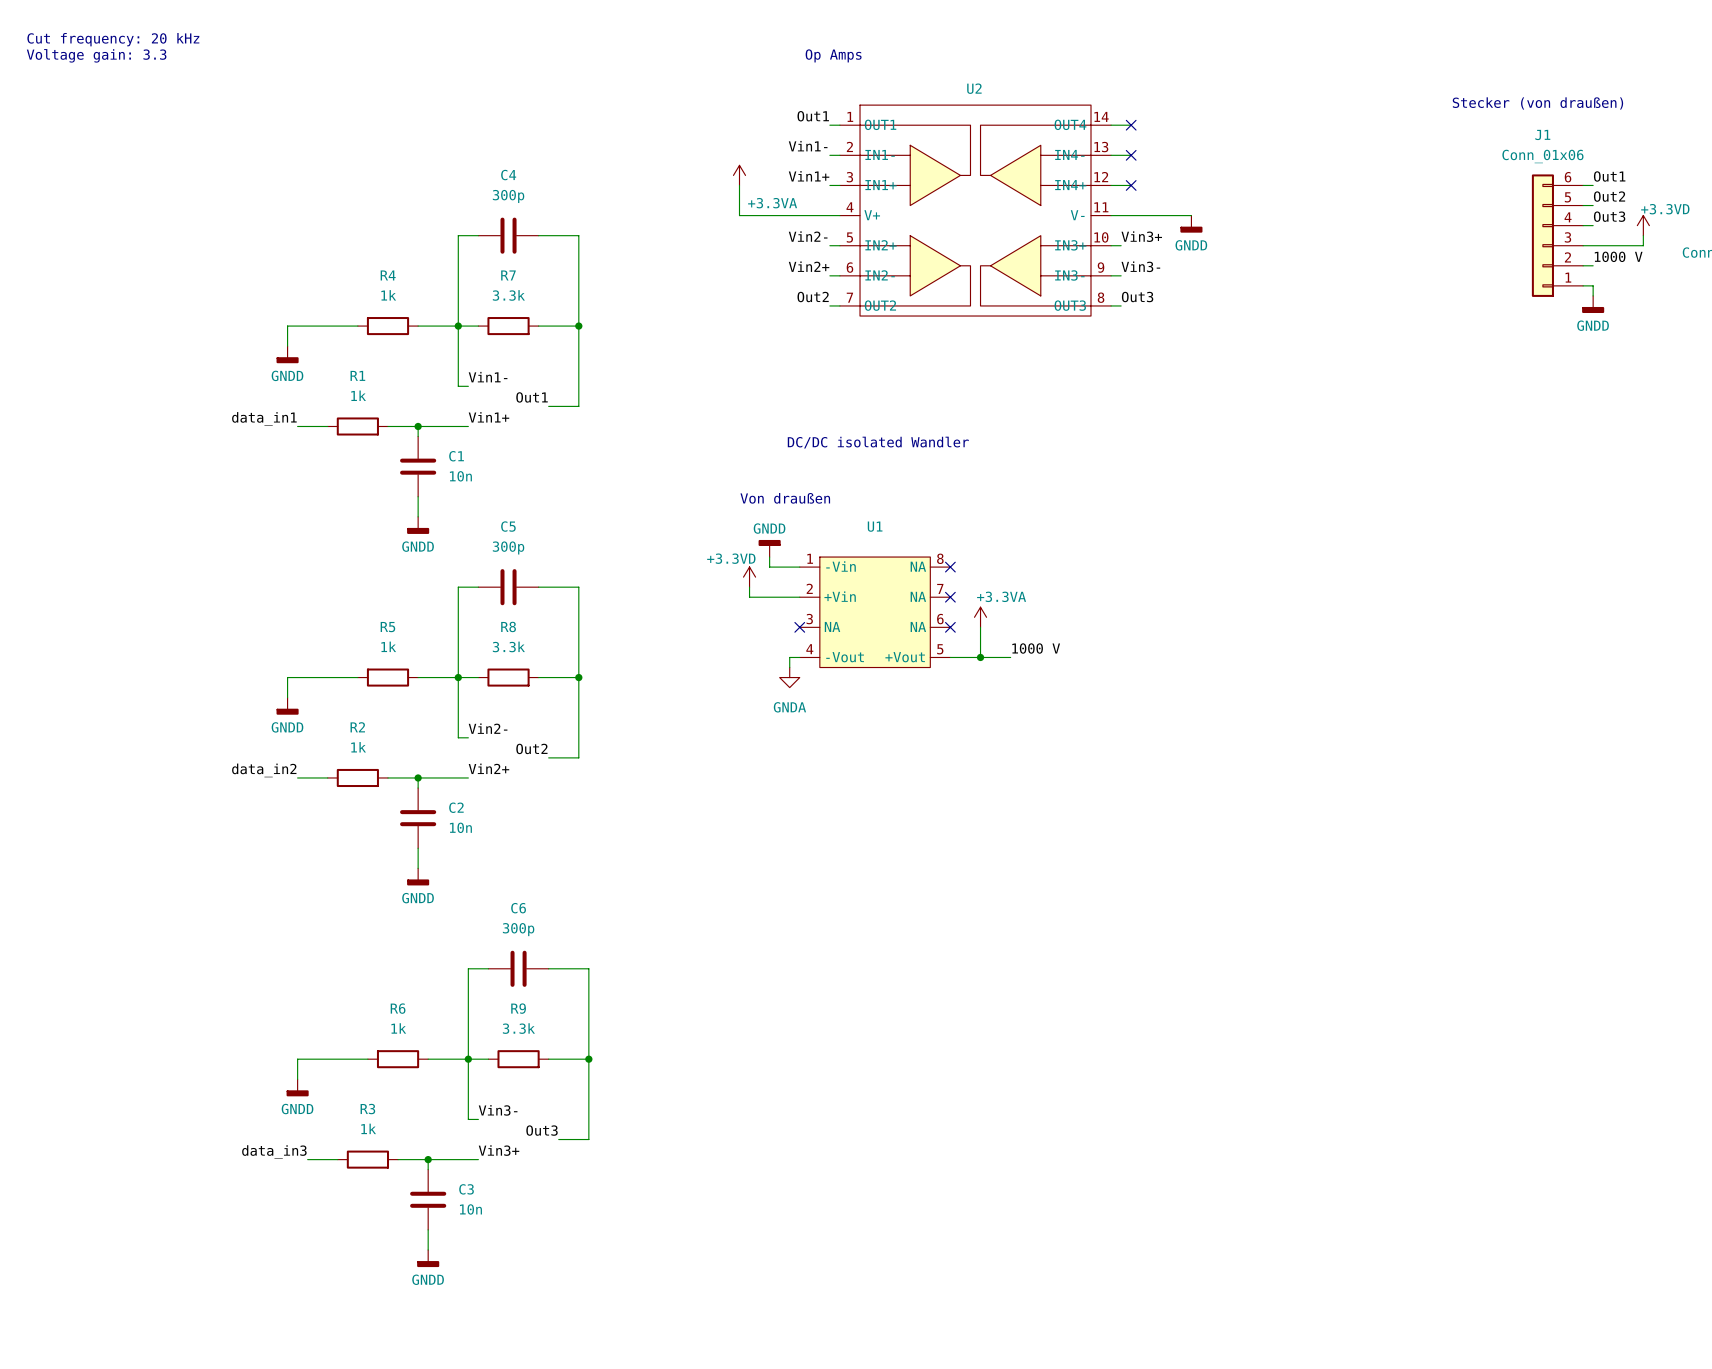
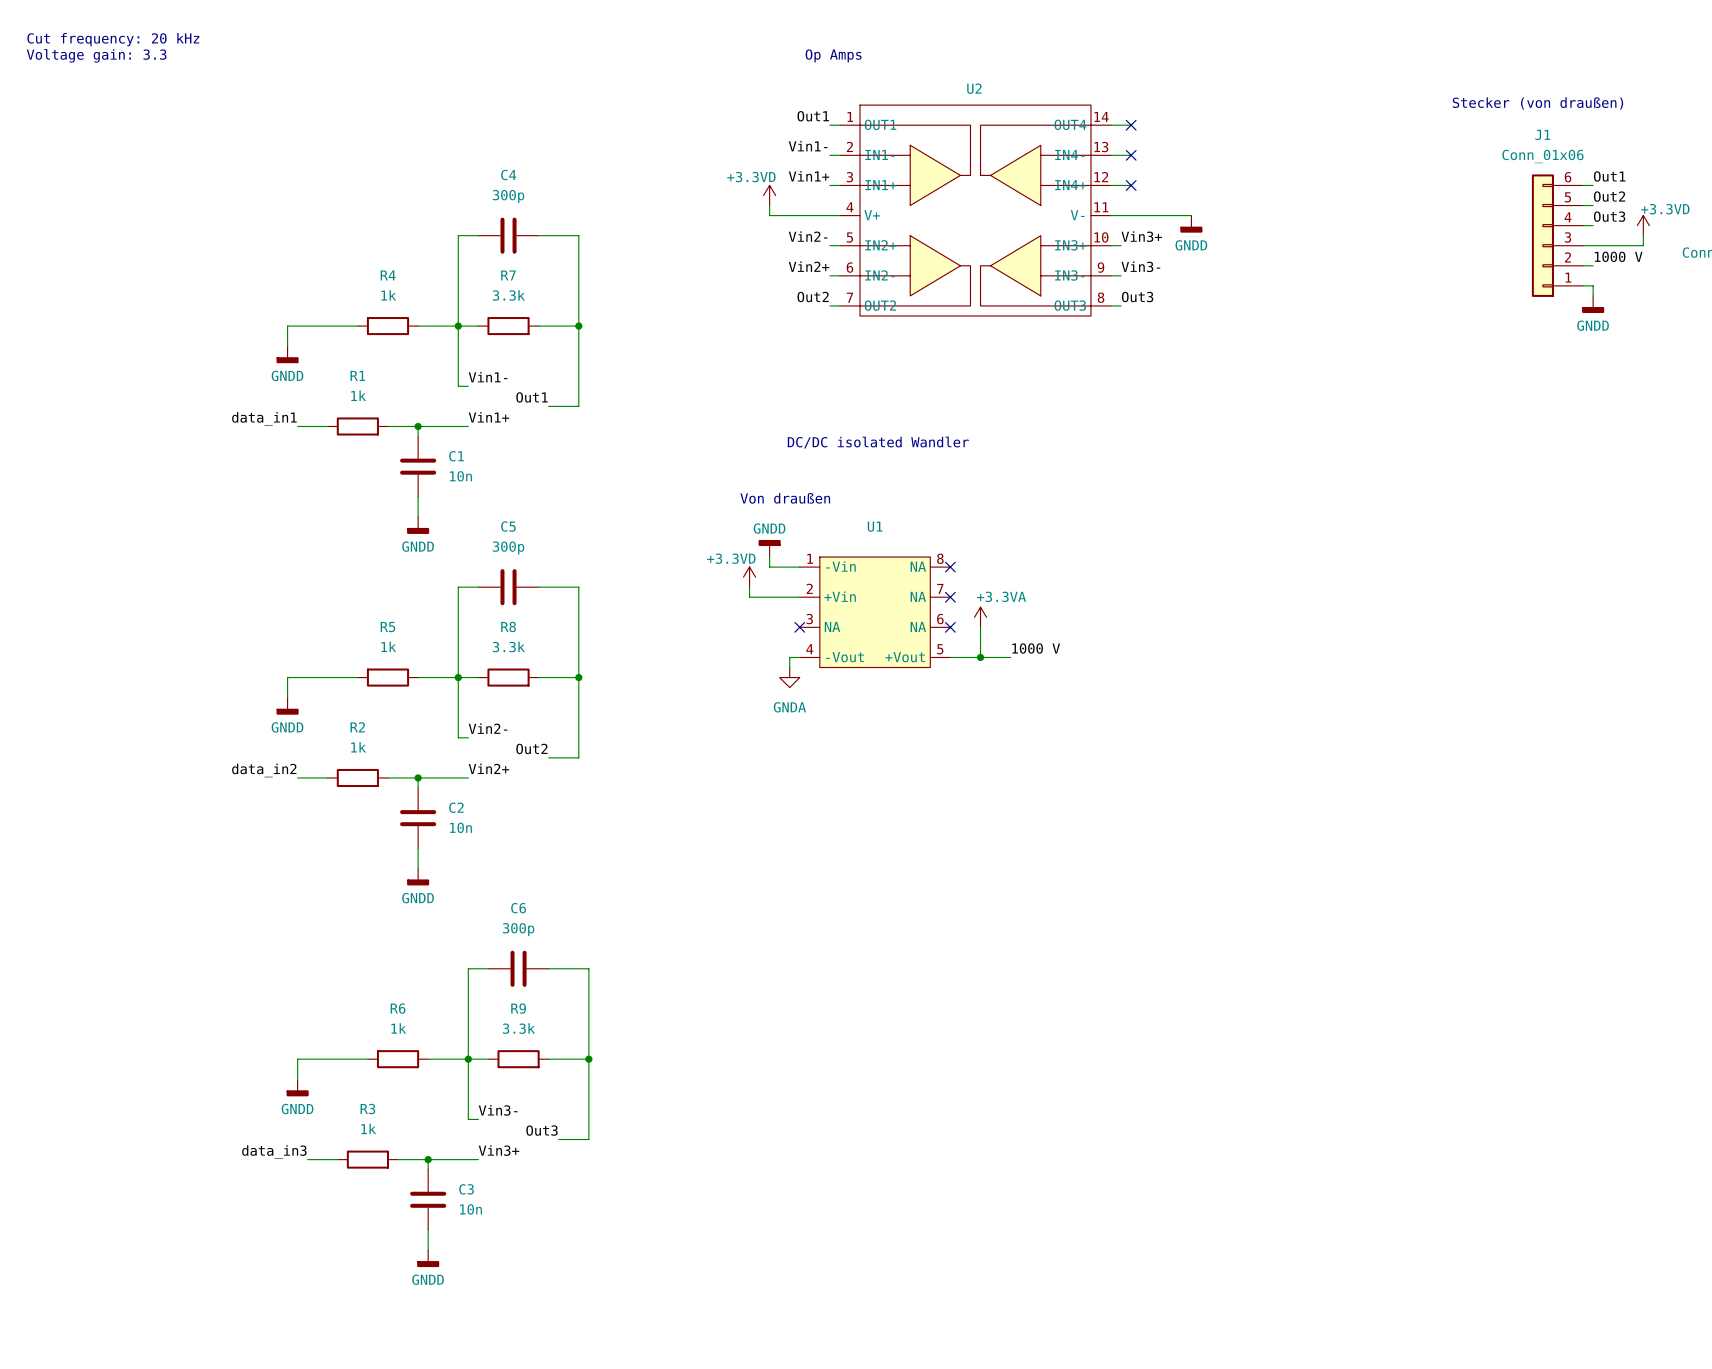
power symbol: +3.3VA (739, 175) -> none
wire: (739, 185) (739, 215) (769, 215) -> (769, 205) (769, 215)
power symbol: none -> +3.3VD (769, 195)

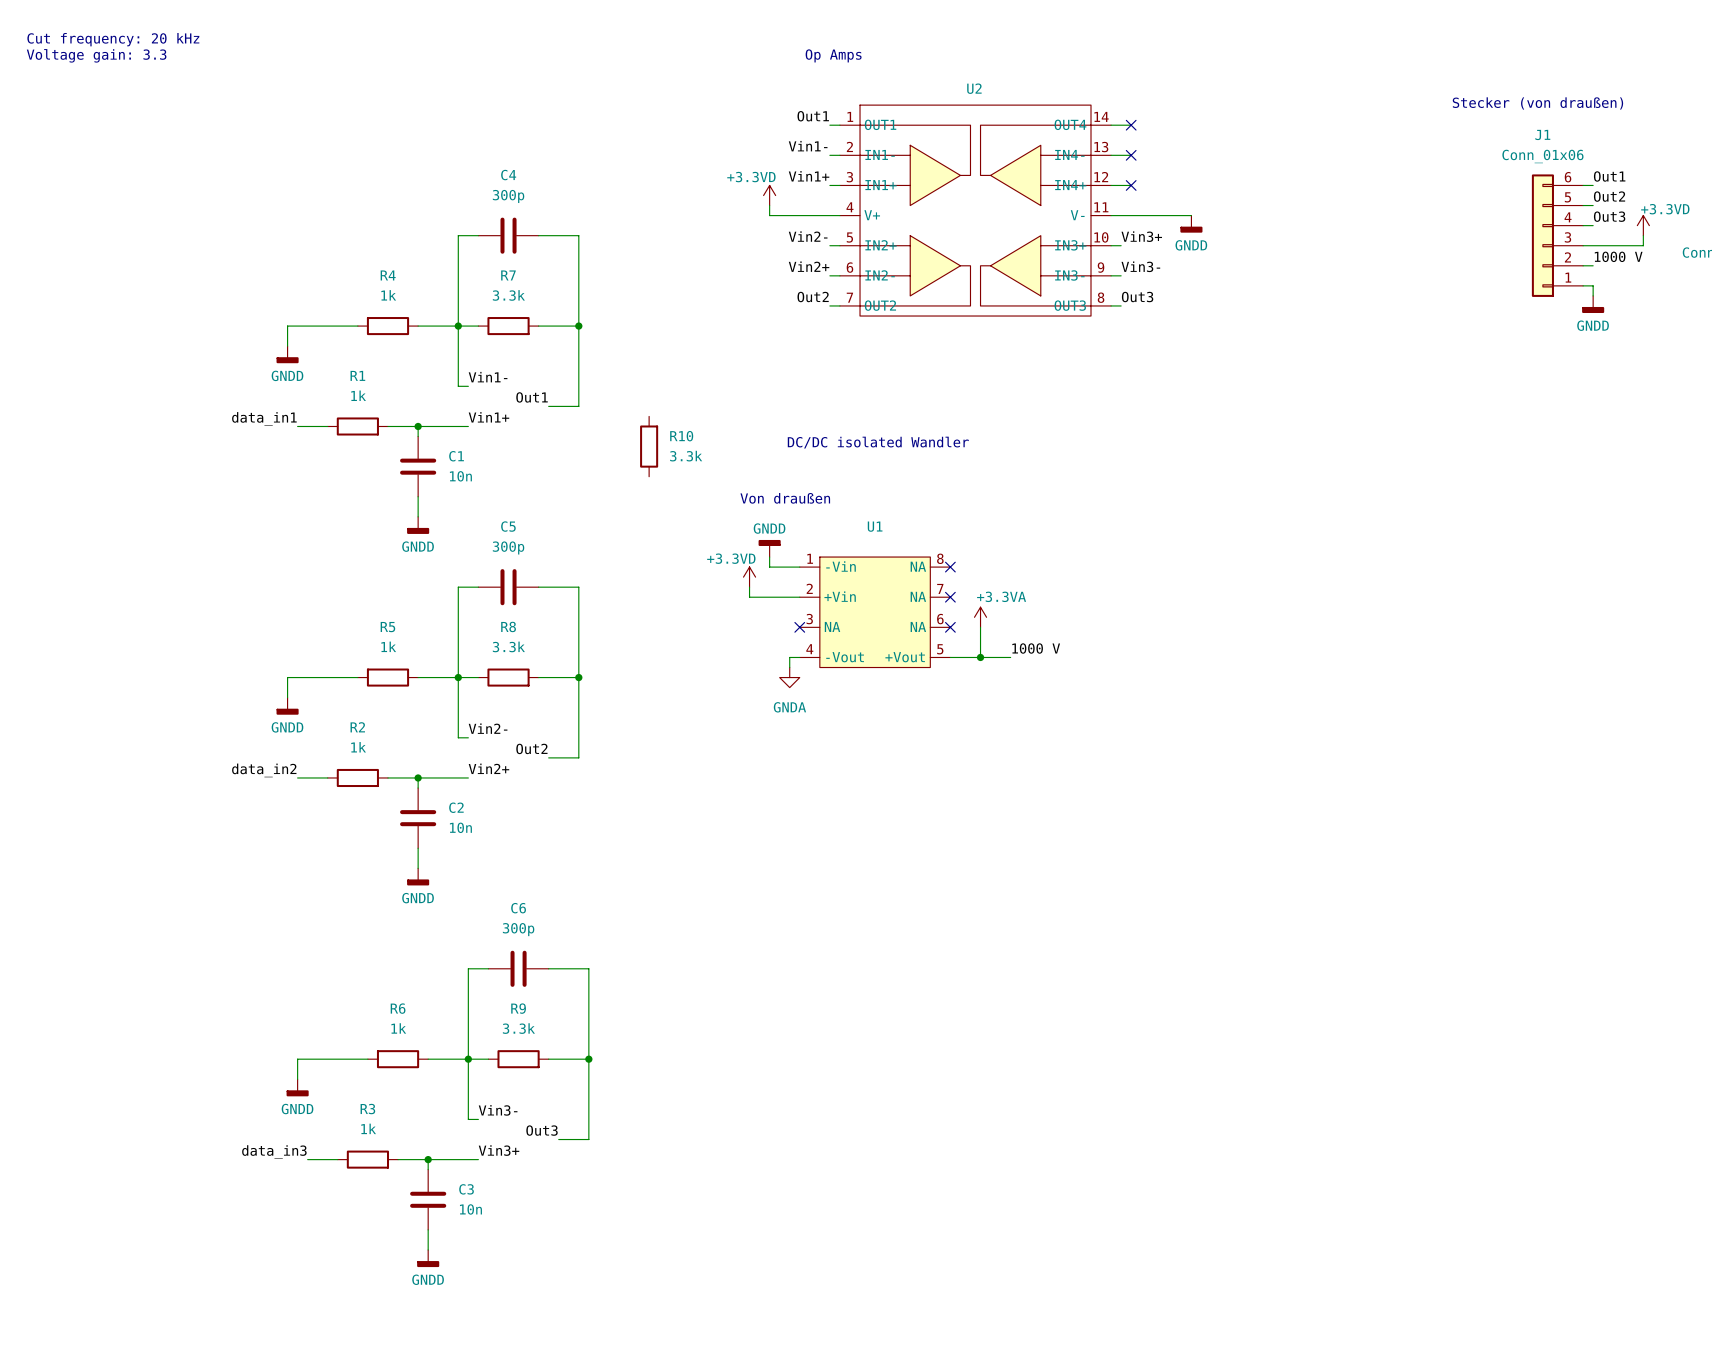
R10: none -> 3.3k (649, 446)

